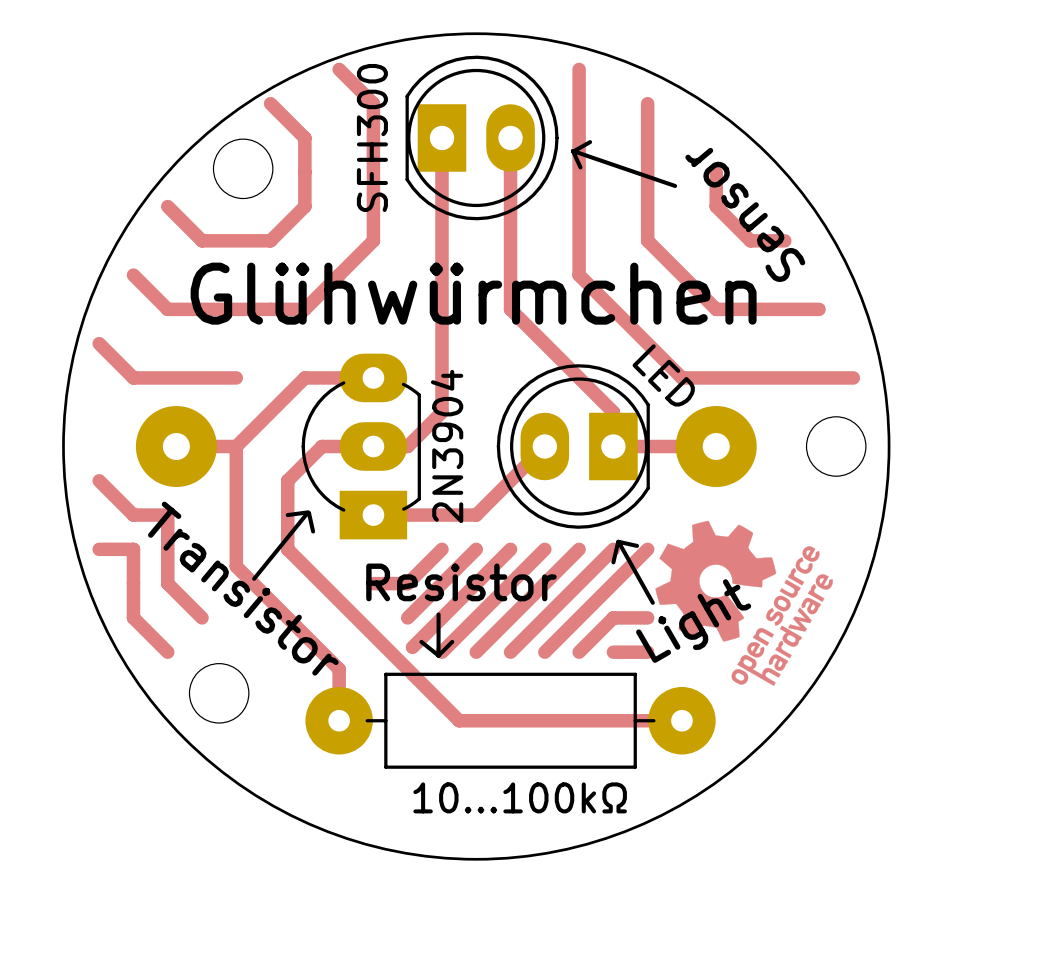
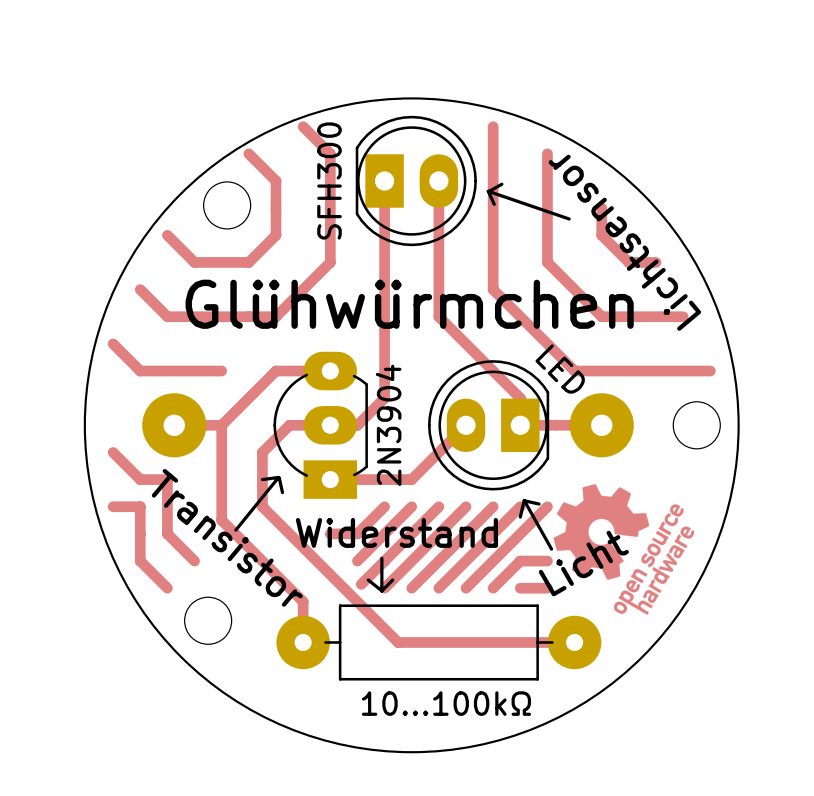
text: Sensor (745, 214) -> Lichtsensor (624, 242)
text: Resistor (461, 582) -> Widerstand (396, 532)
text: Light (693, 621) -> Licht (583, 563)

